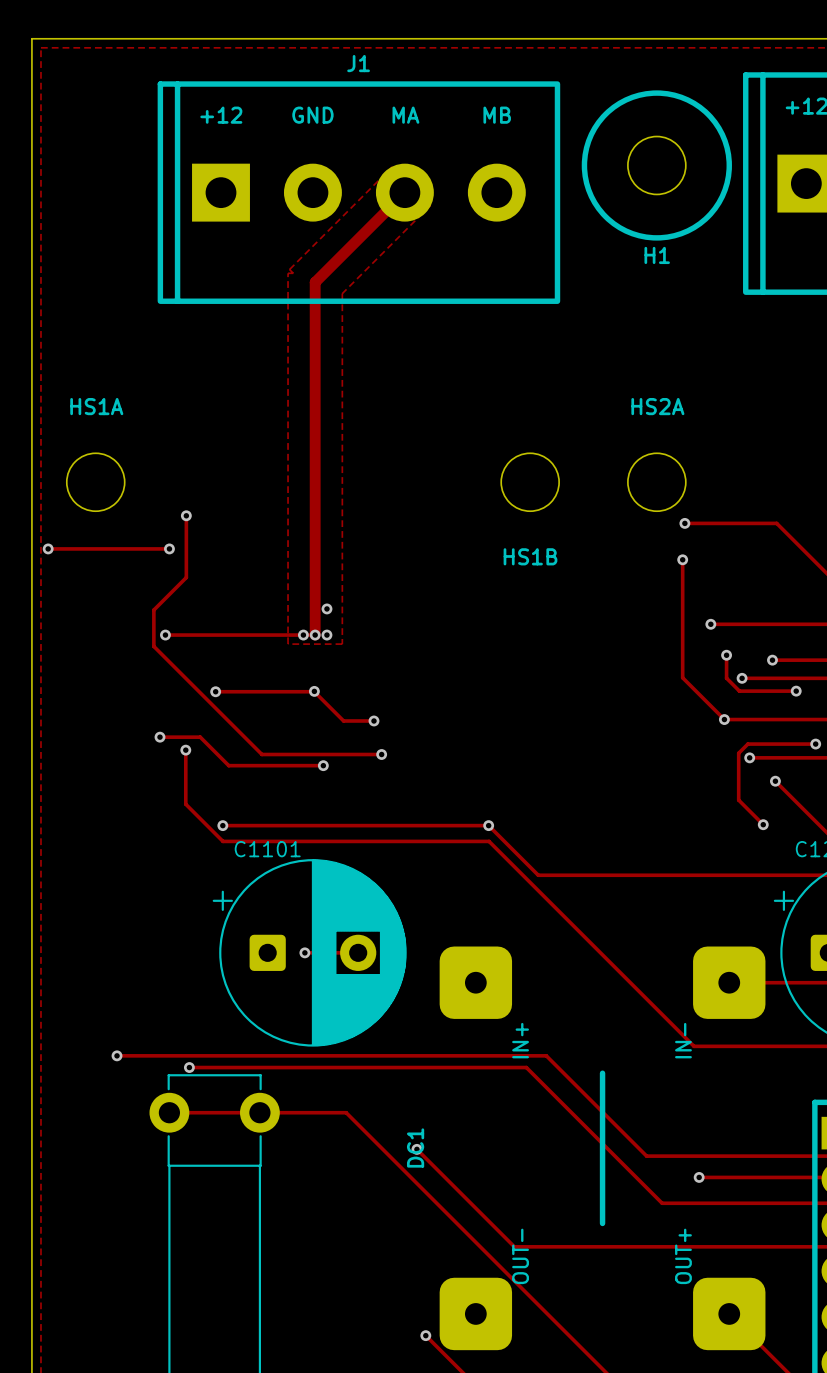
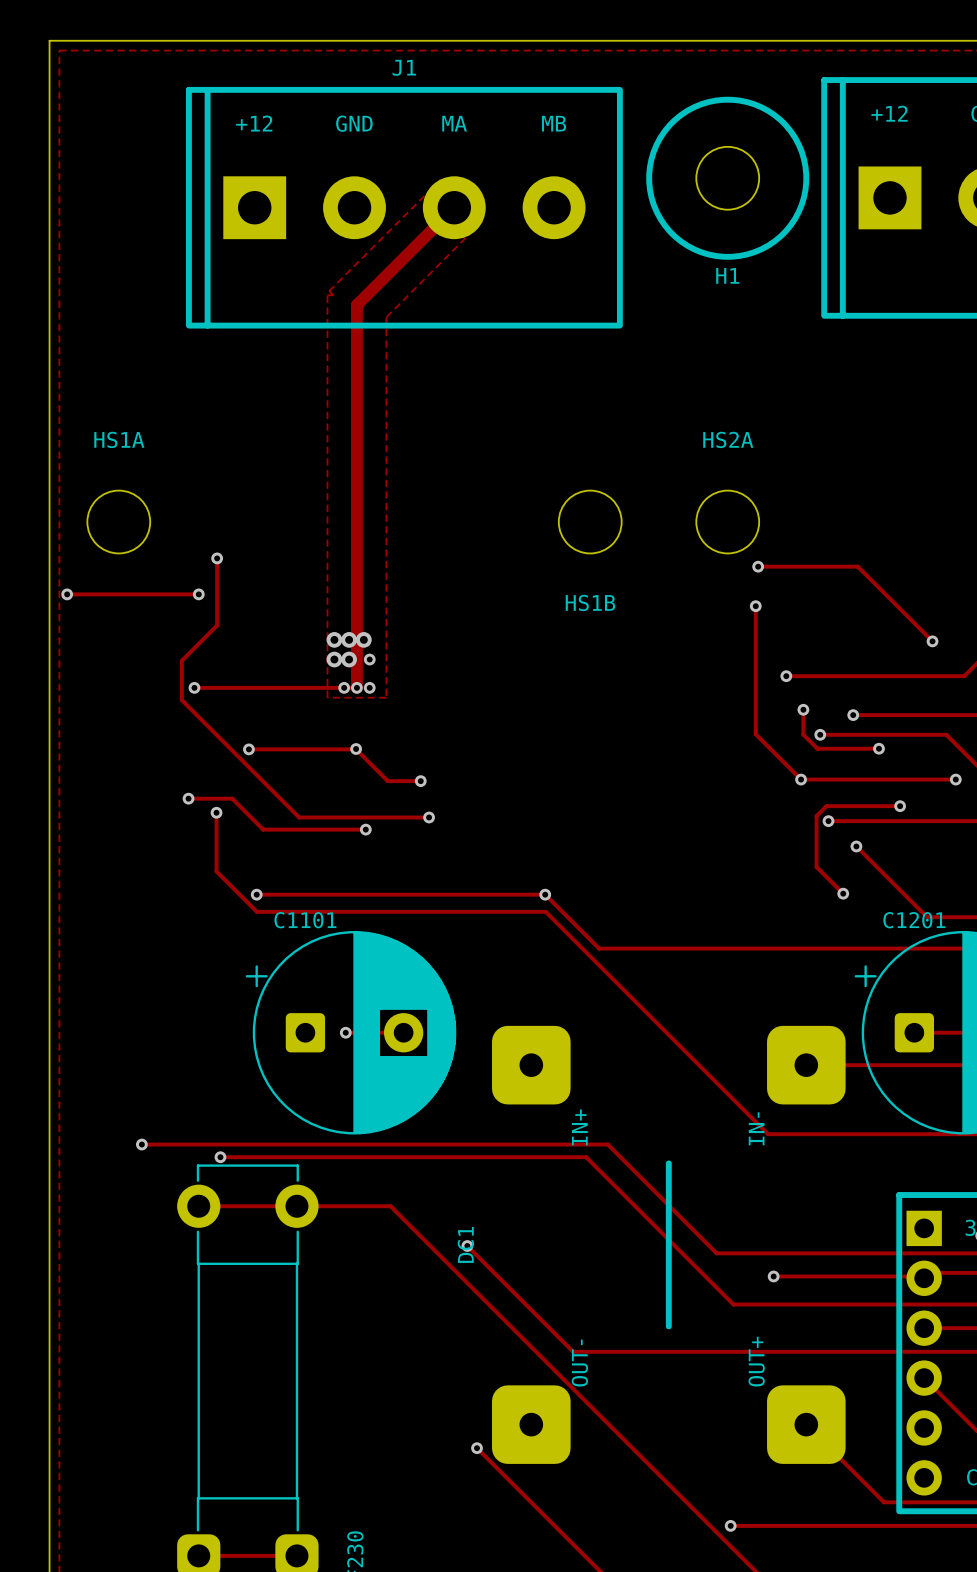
via: none -> (334, 639)
via: none -> (349, 639)
via: none -> (363, 639)
via: none -> (334, 659)
via: none -> (349, 659)

